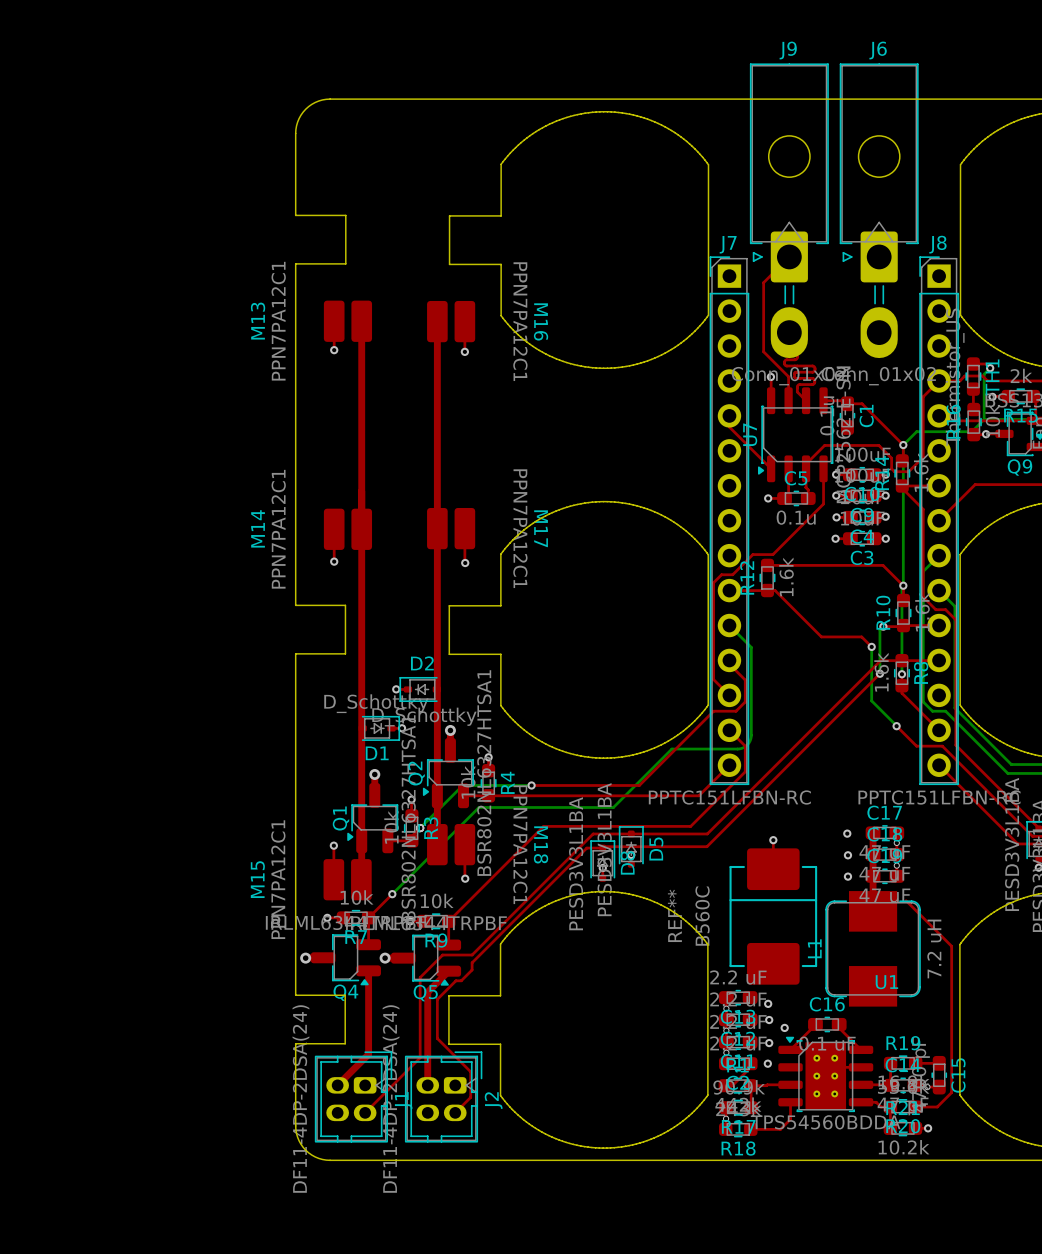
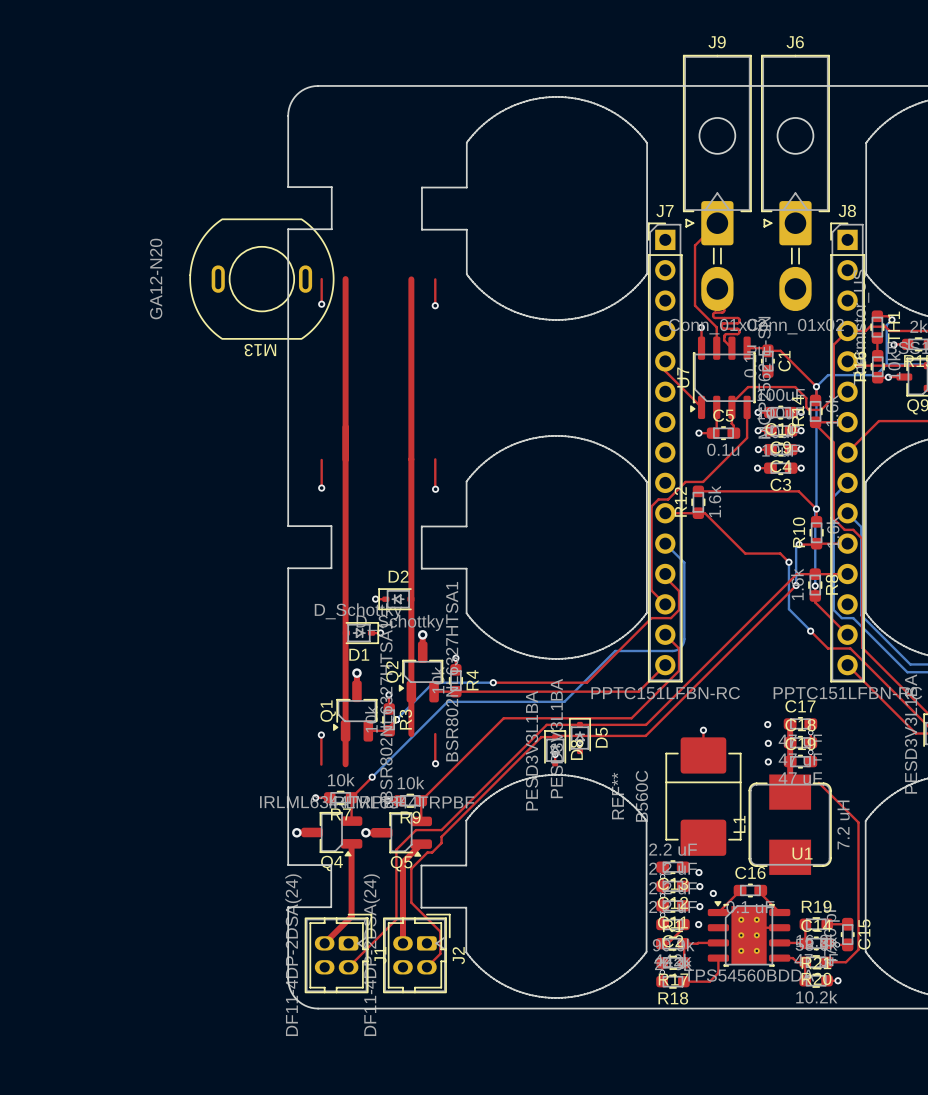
M13 footprint: [323, 300, 373, 342] -> [189, 218, 335, 340]
M13 name position: M13 (258, 321) -> M13 (260, 350)
M13 value: PPN7PA12C1 (278, 321) -> GA12-N20 (156, 279)
M16: PPN7PA12C1 (451, 321) -> none
M17: PPN7PA12C1 (451, 528) -> none
M14: PPN7PA12C1 (347, 529) -> none
M18: PPN7PA12C1 (451, 844) -> none
M15: PPN7PA12C1 (347, 879) -> none

